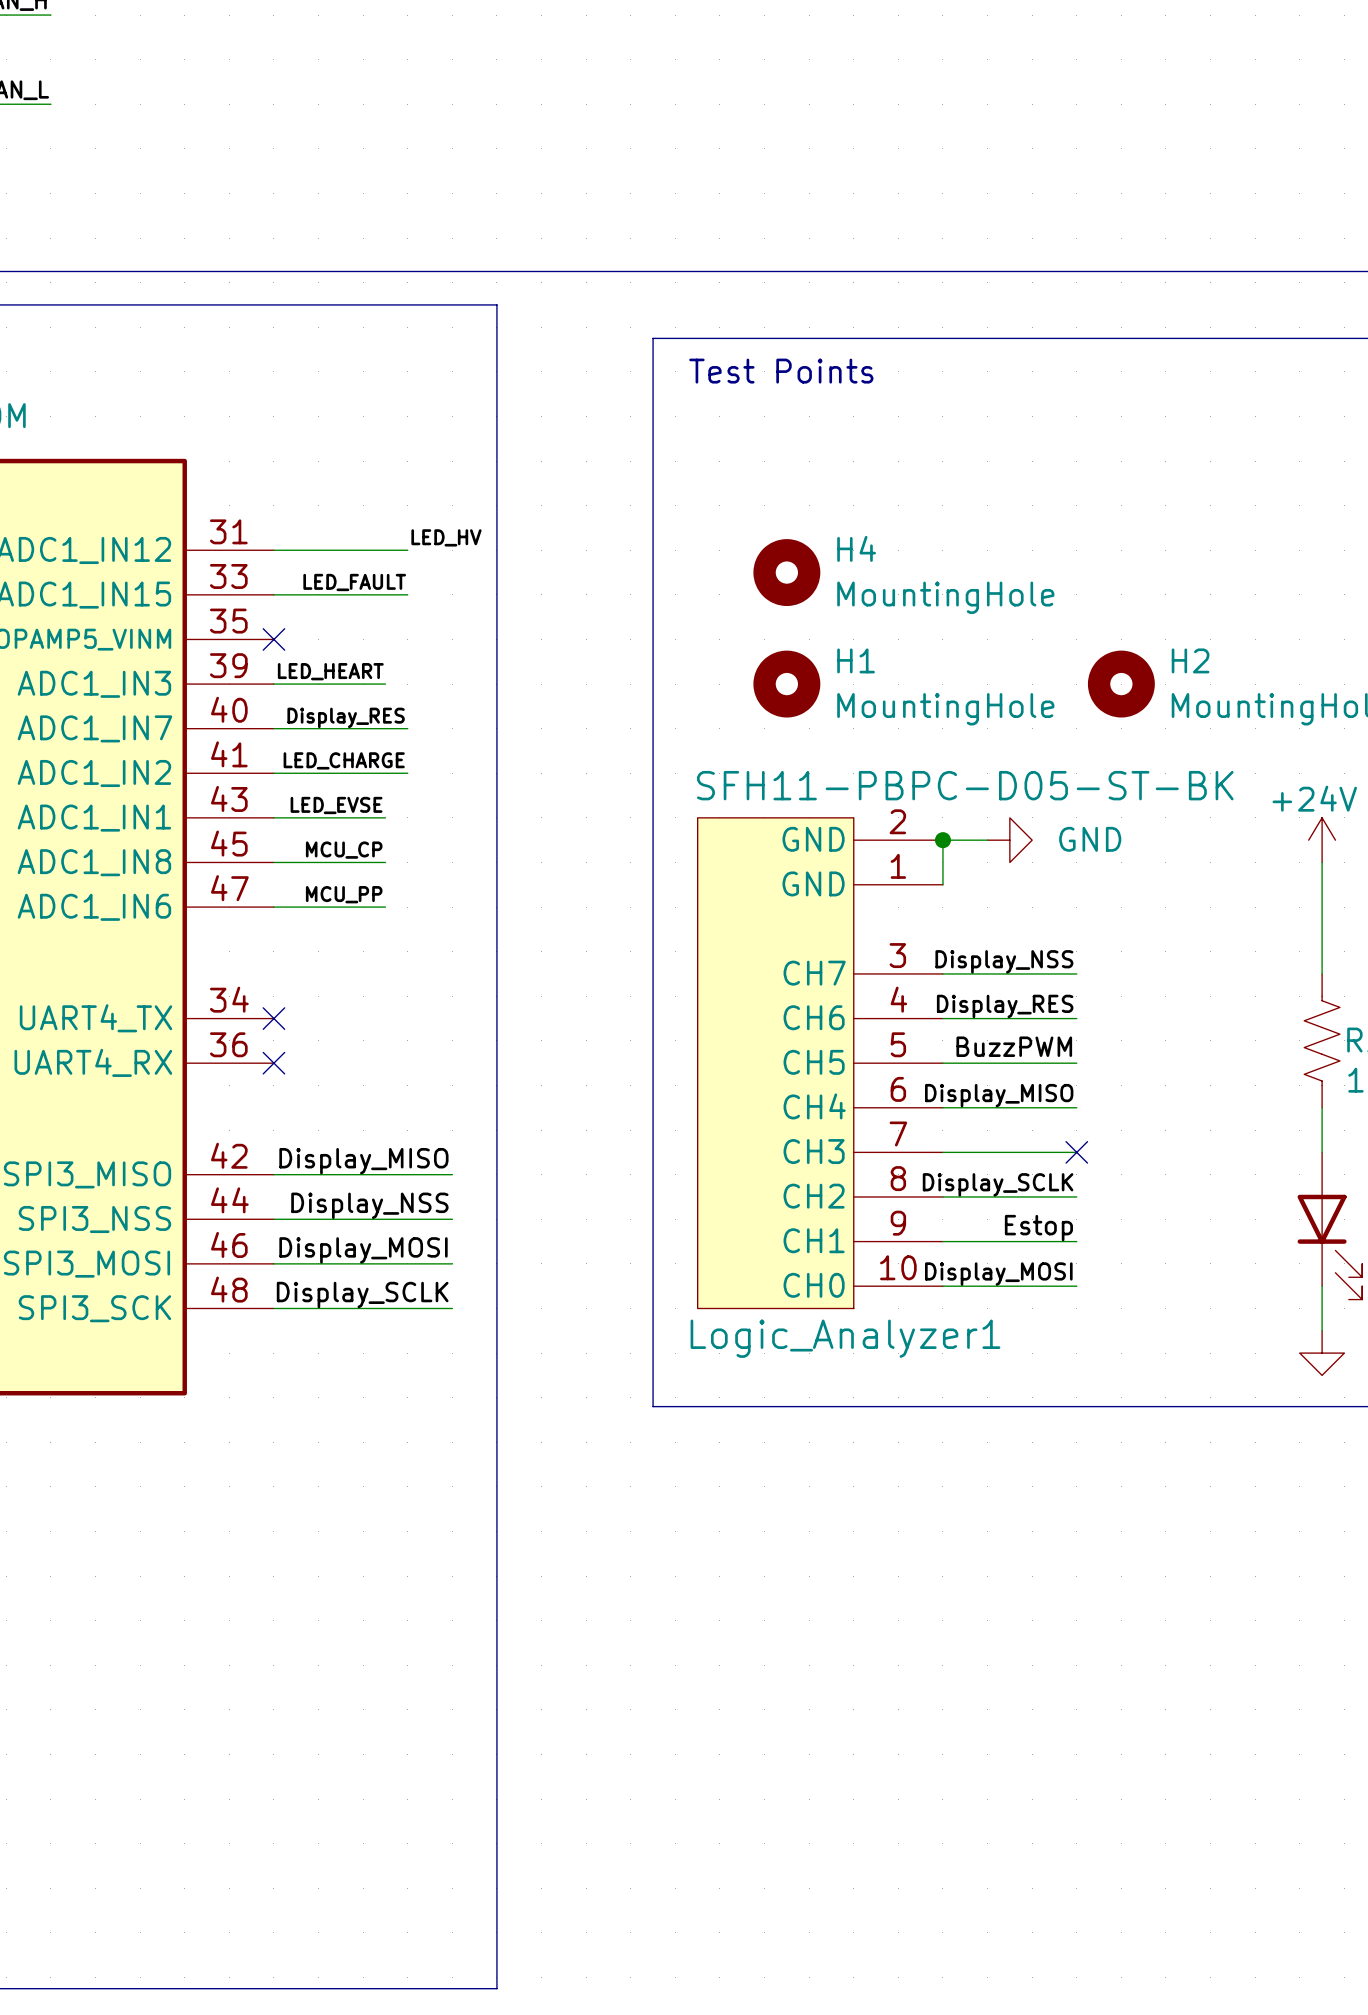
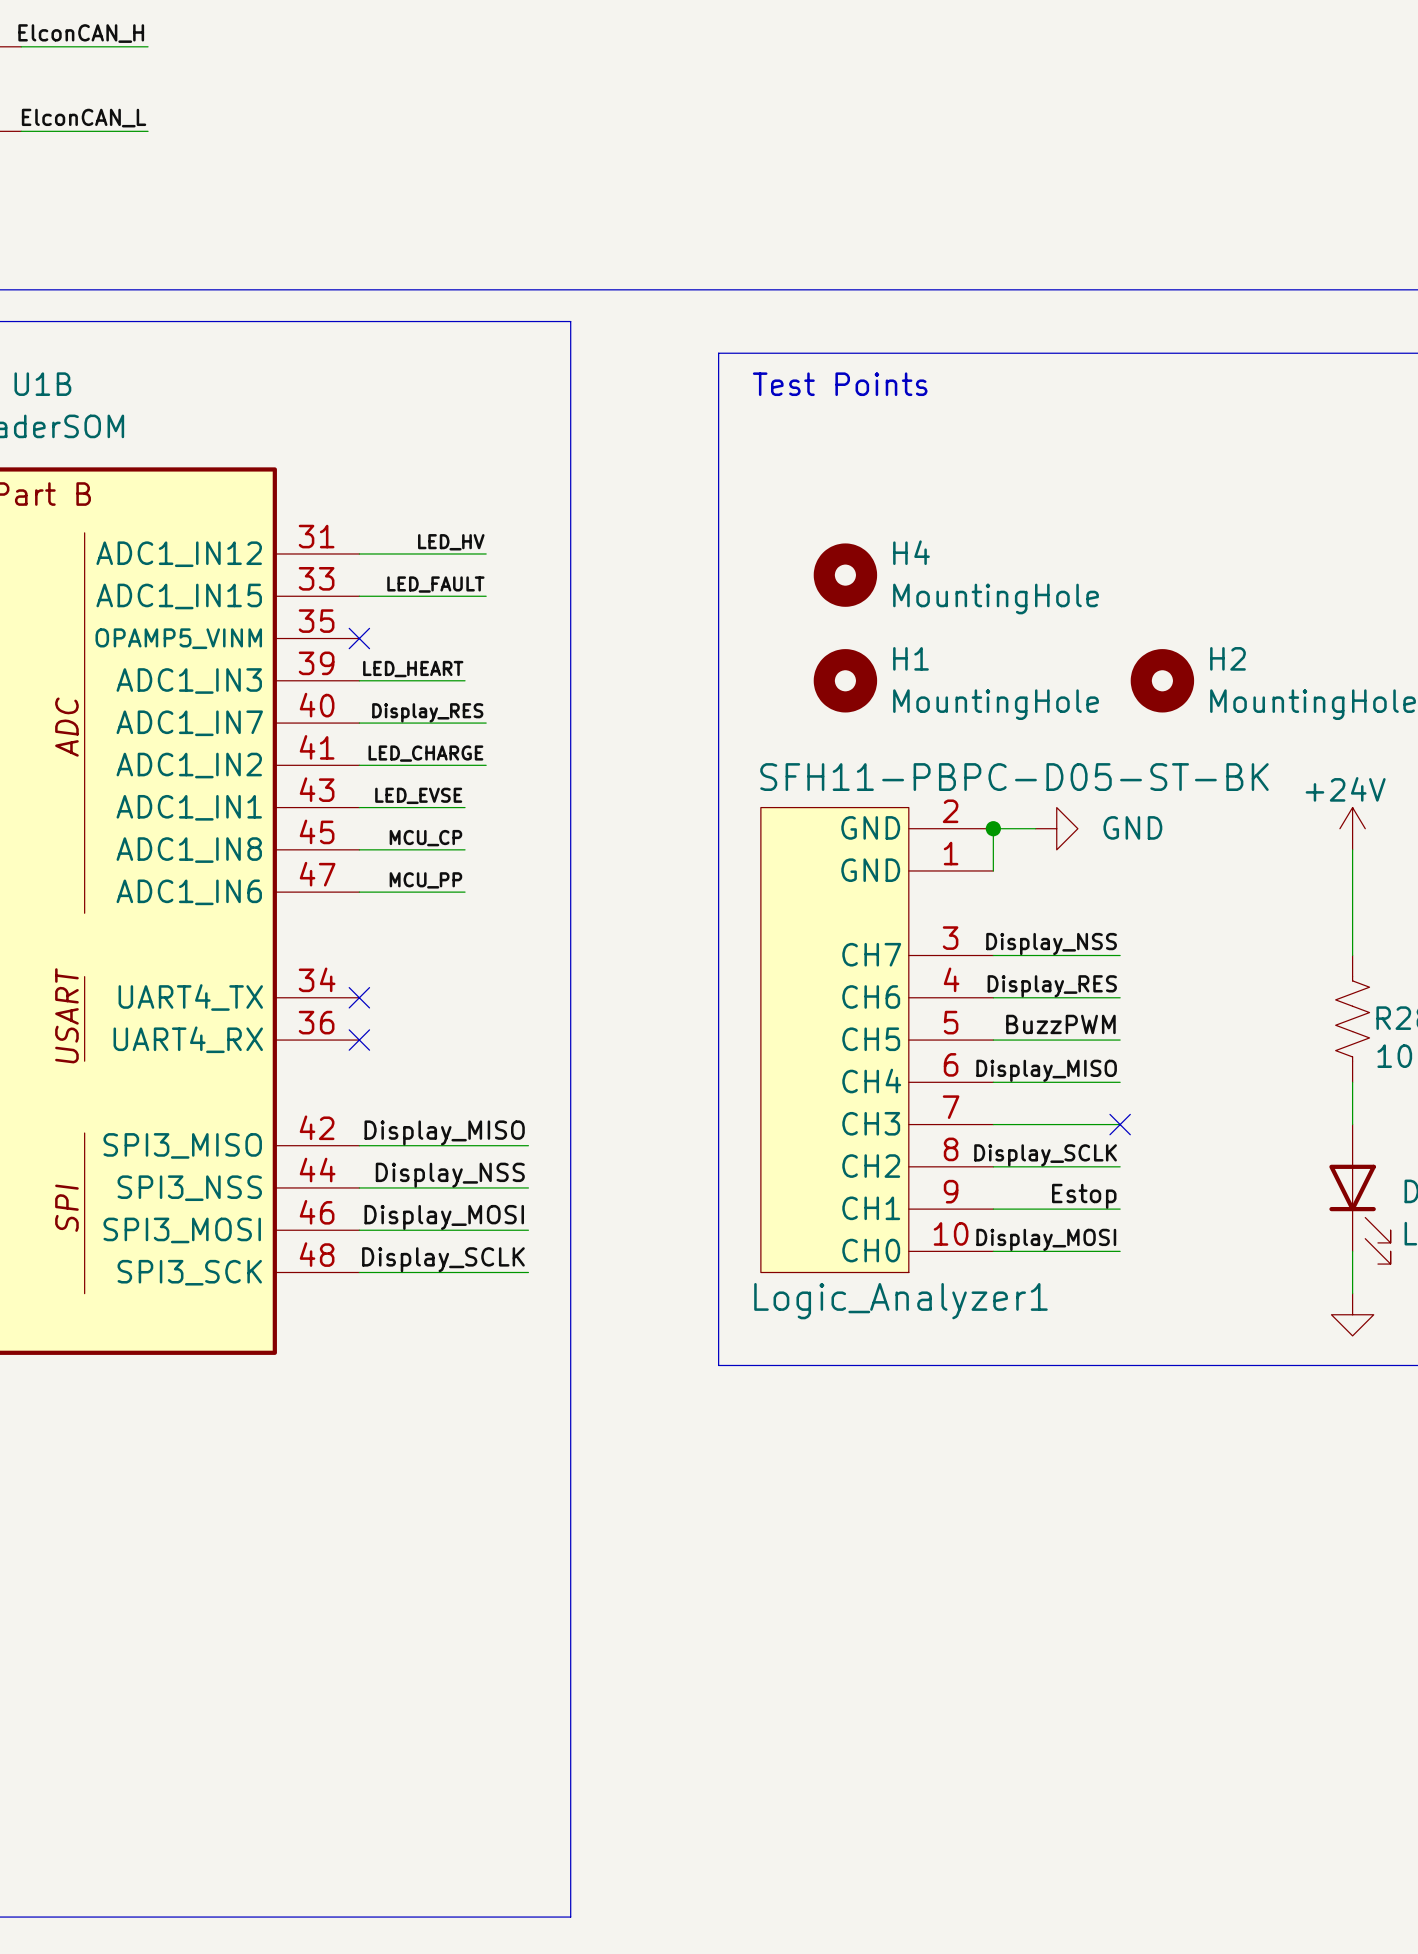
label position: LED_HV (446, 537) -> LED_HV (451, 542)

